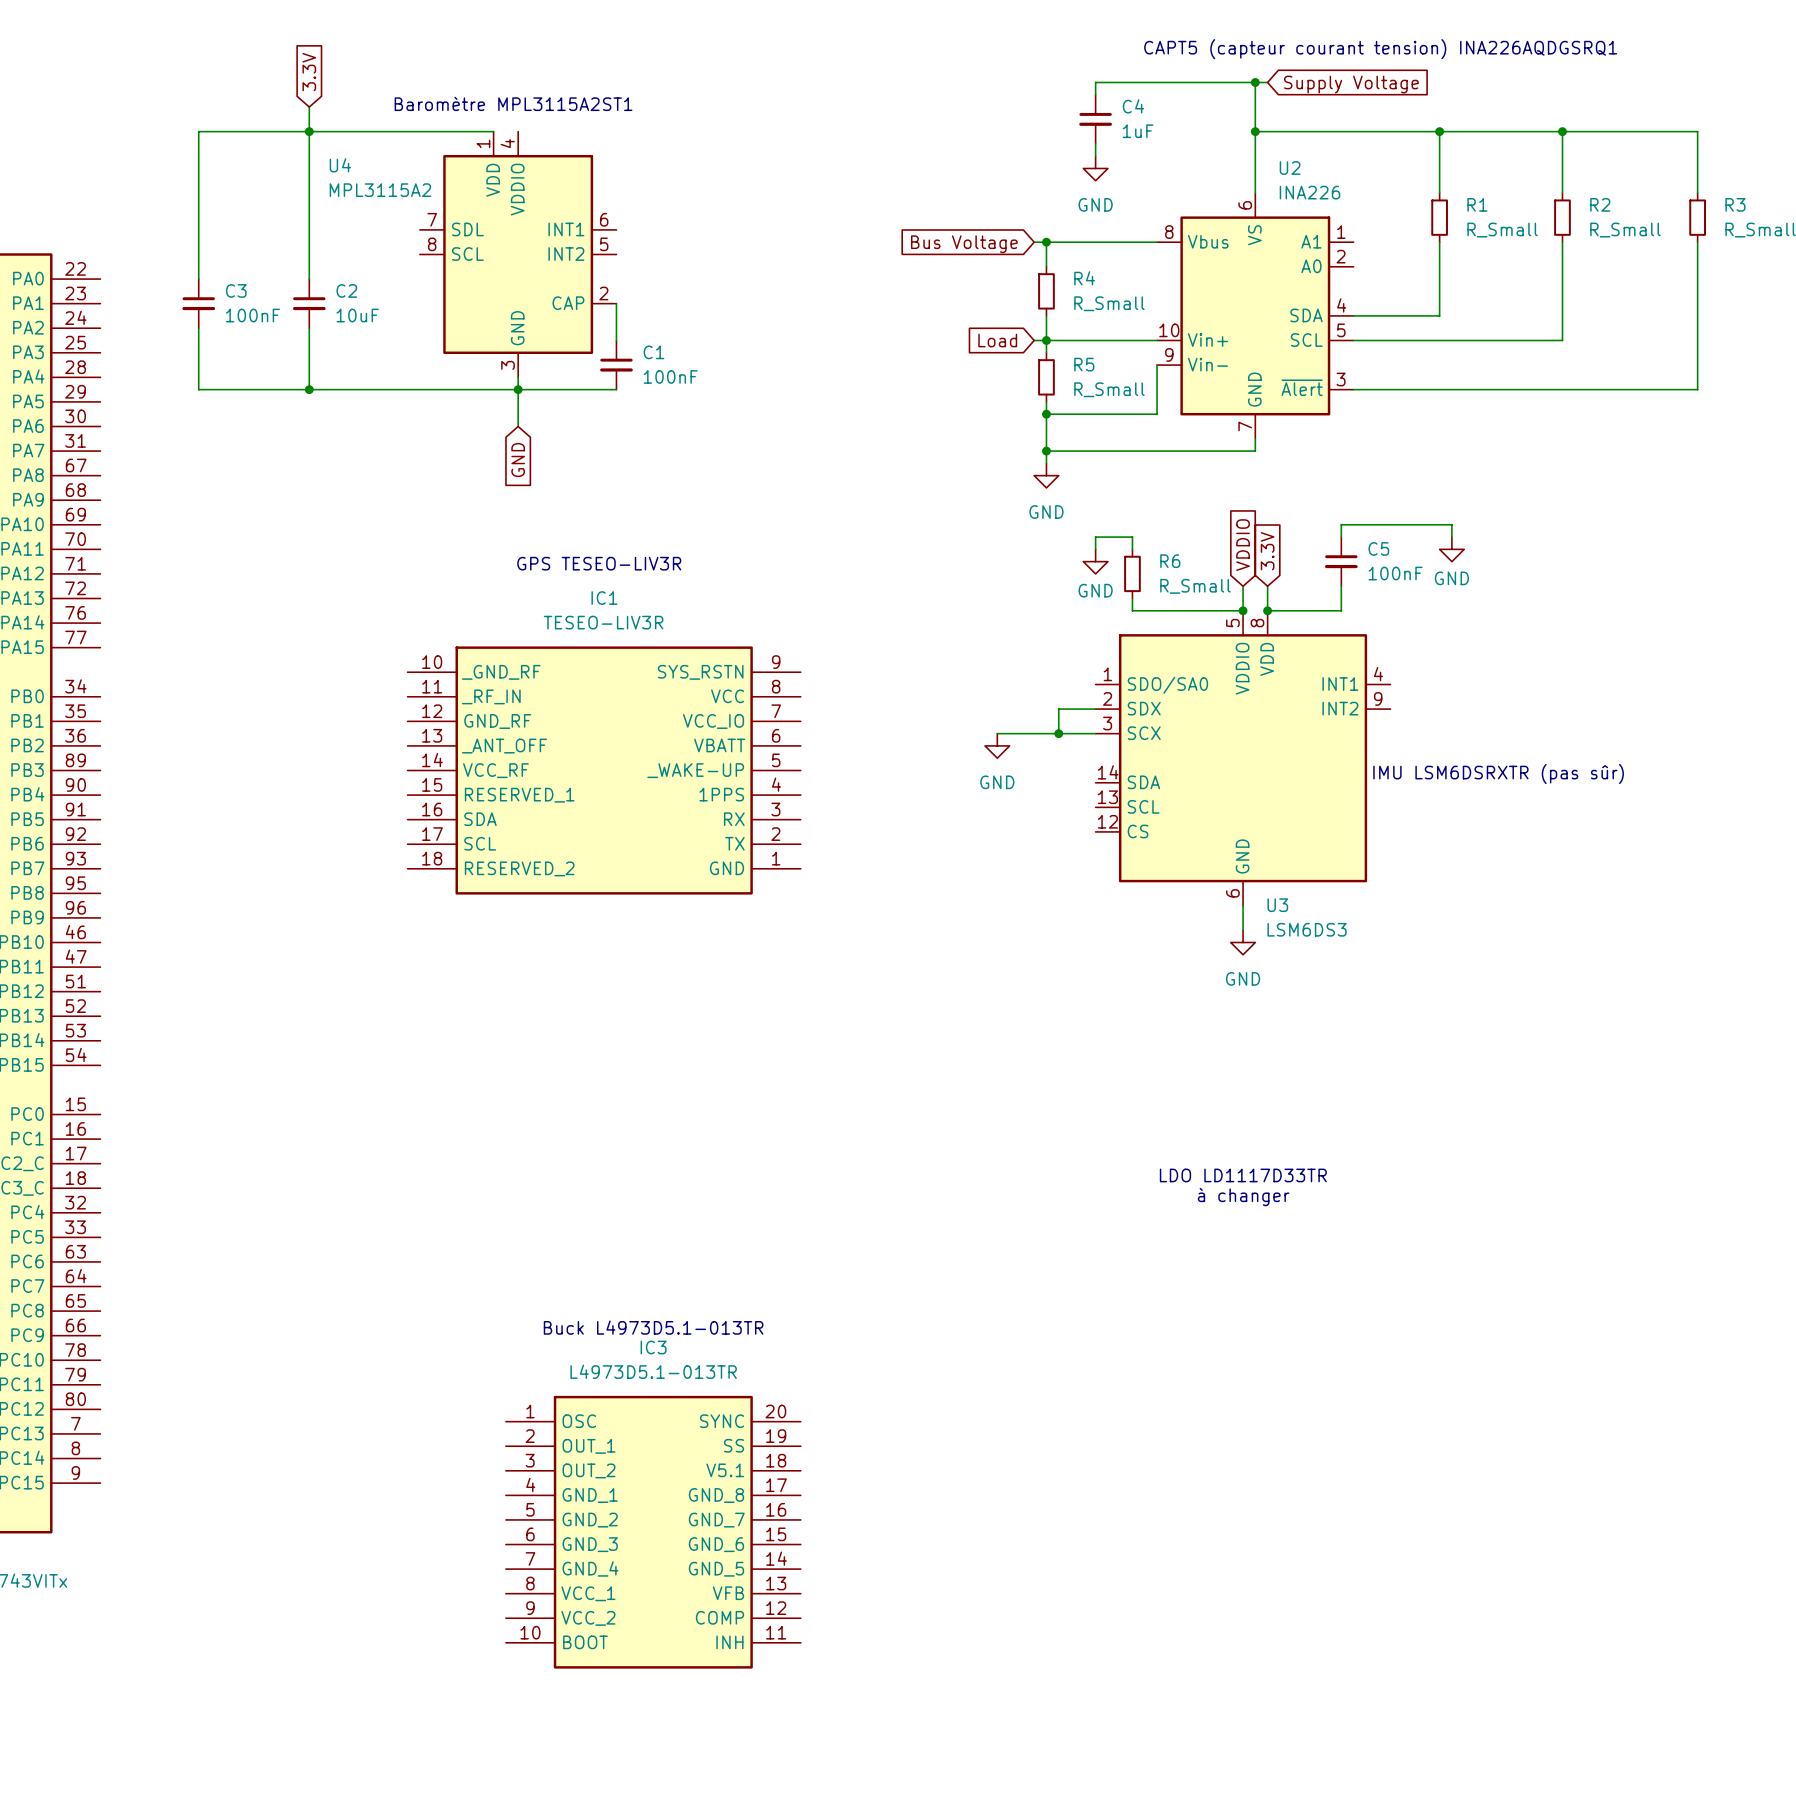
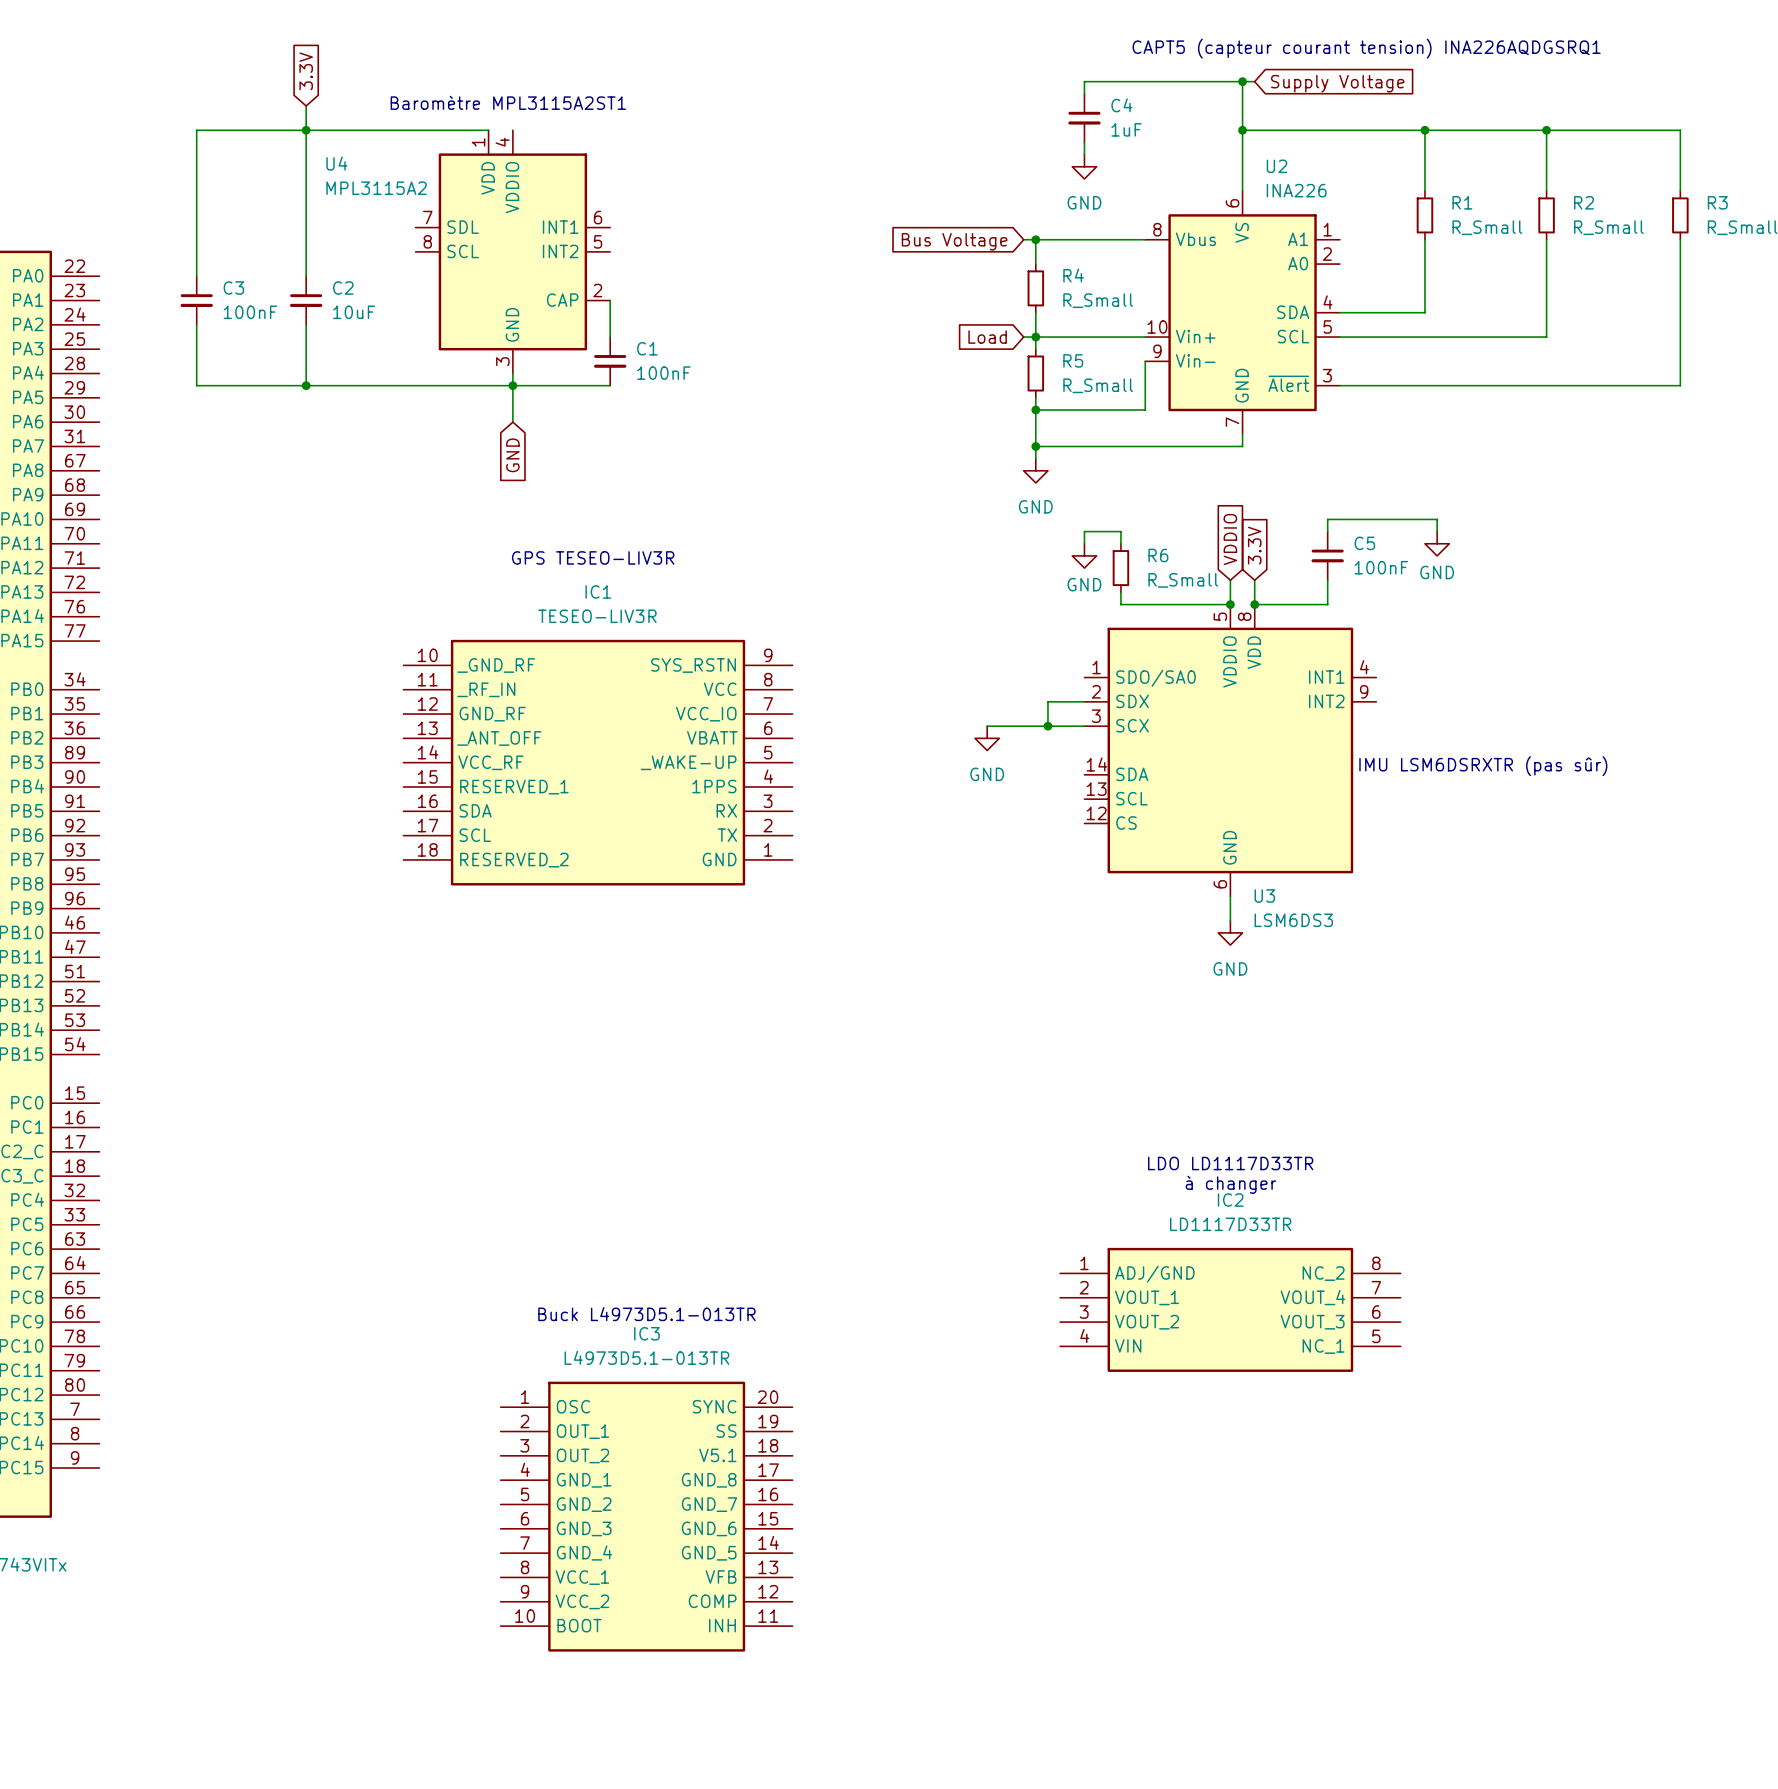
IC2: none -> LD1117D33TR (1230, 1309)

